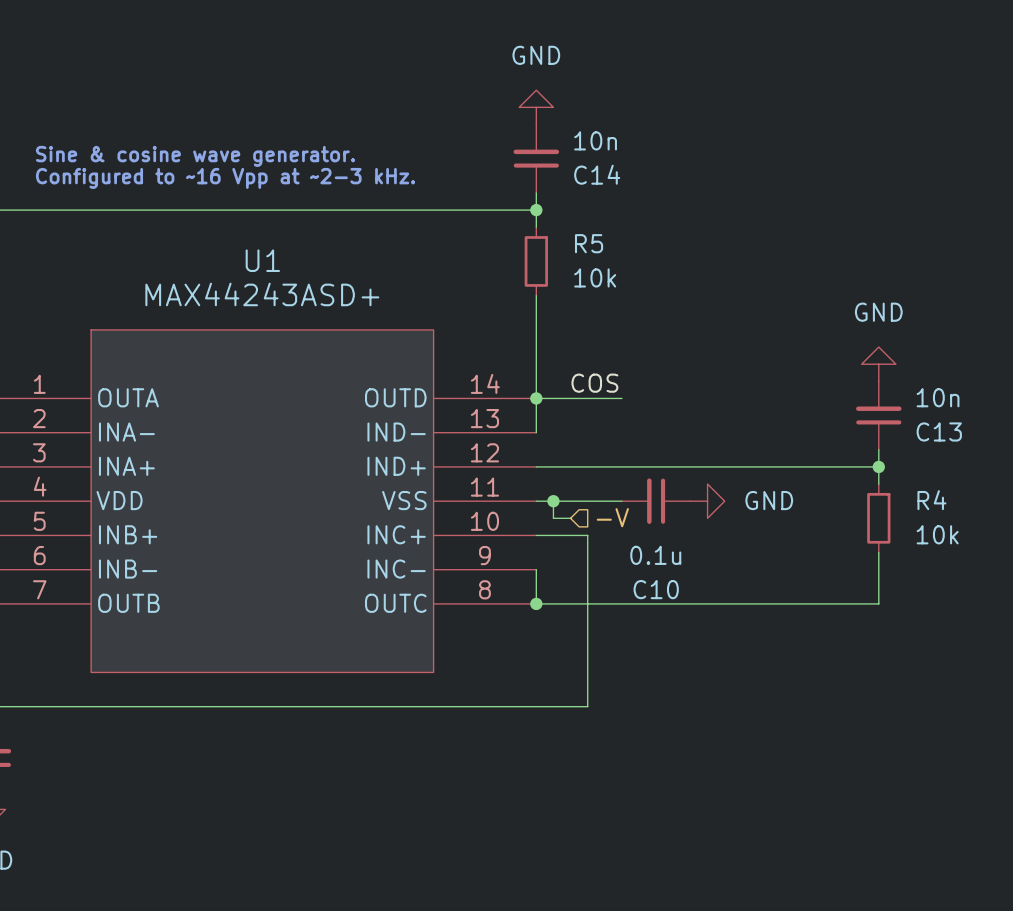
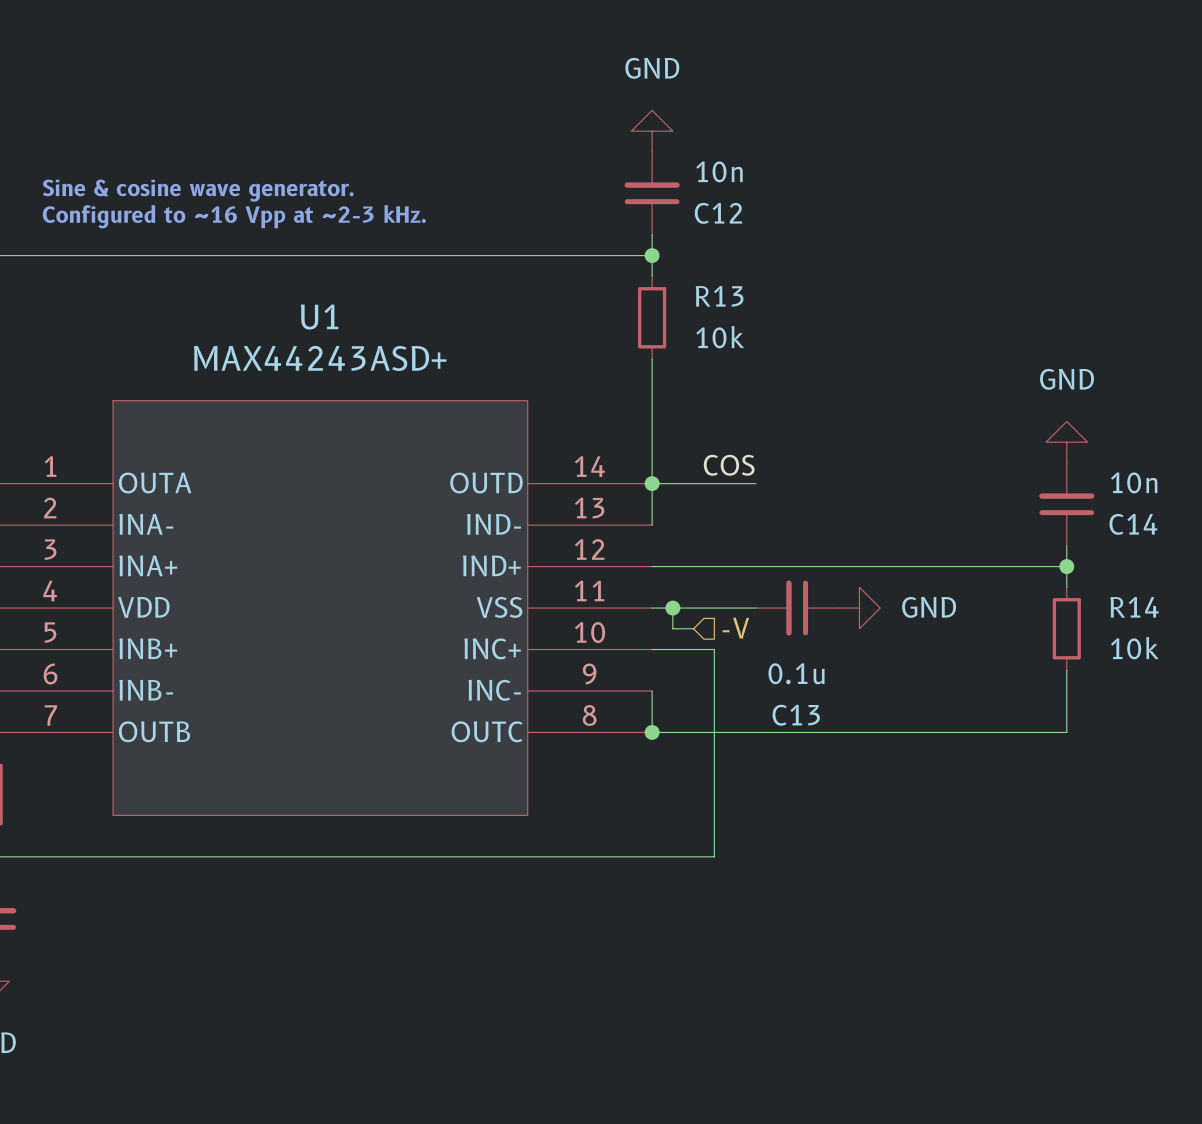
C14 name: C14 (597, 174) -> C12 (718, 213)
R5 name: R5 (589, 243) -> R13 (719, 296)
C13 name: C13 (939, 431) -> C14 (1133, 524)
R4 name: R4 (931, 500) -> R14 (1134, 607)
C10 name: C10 (656, 589) -> C13 (796, 715)

